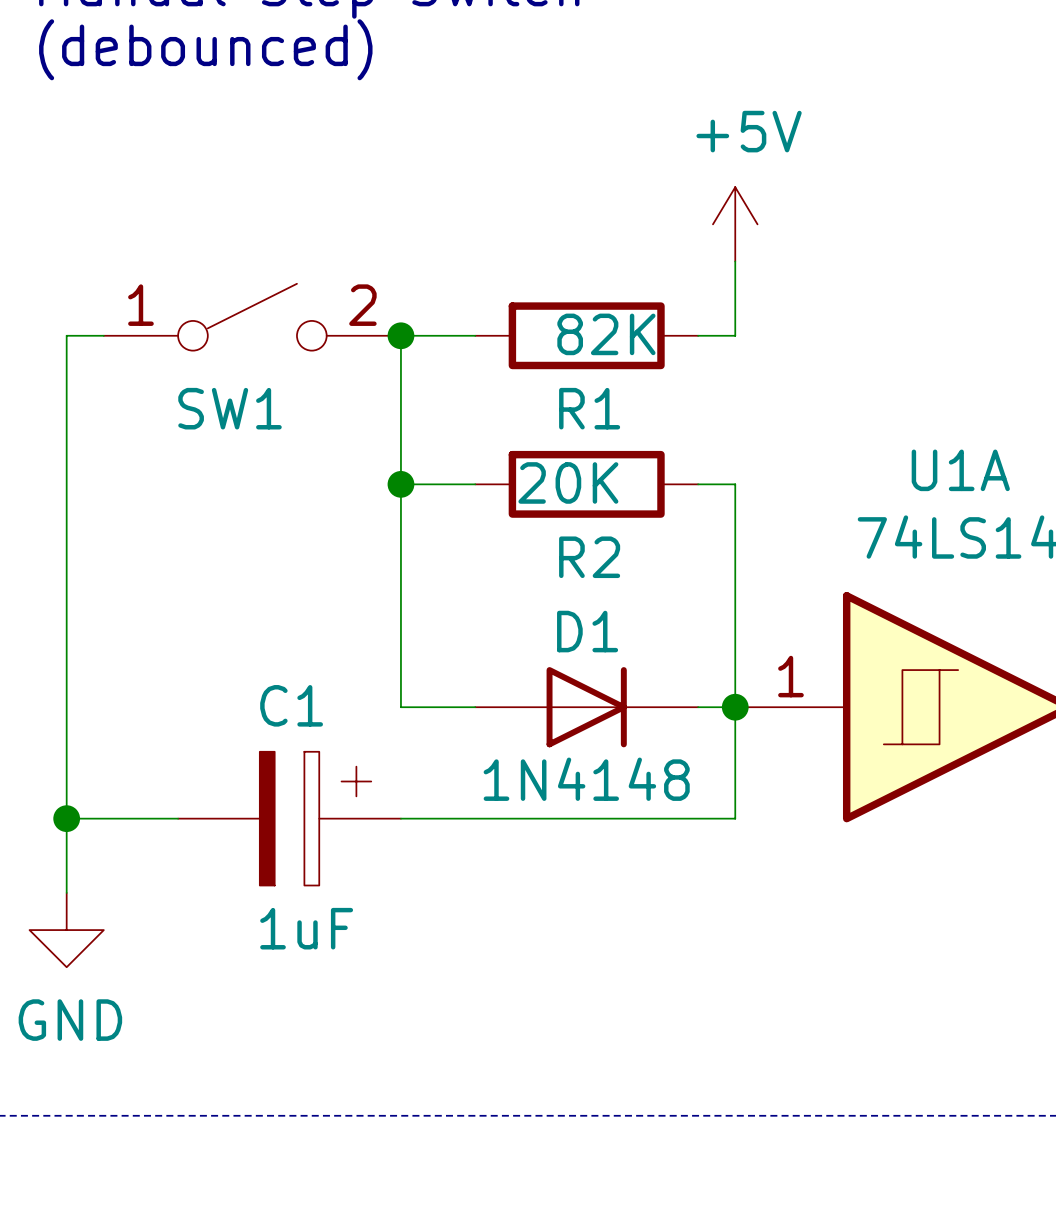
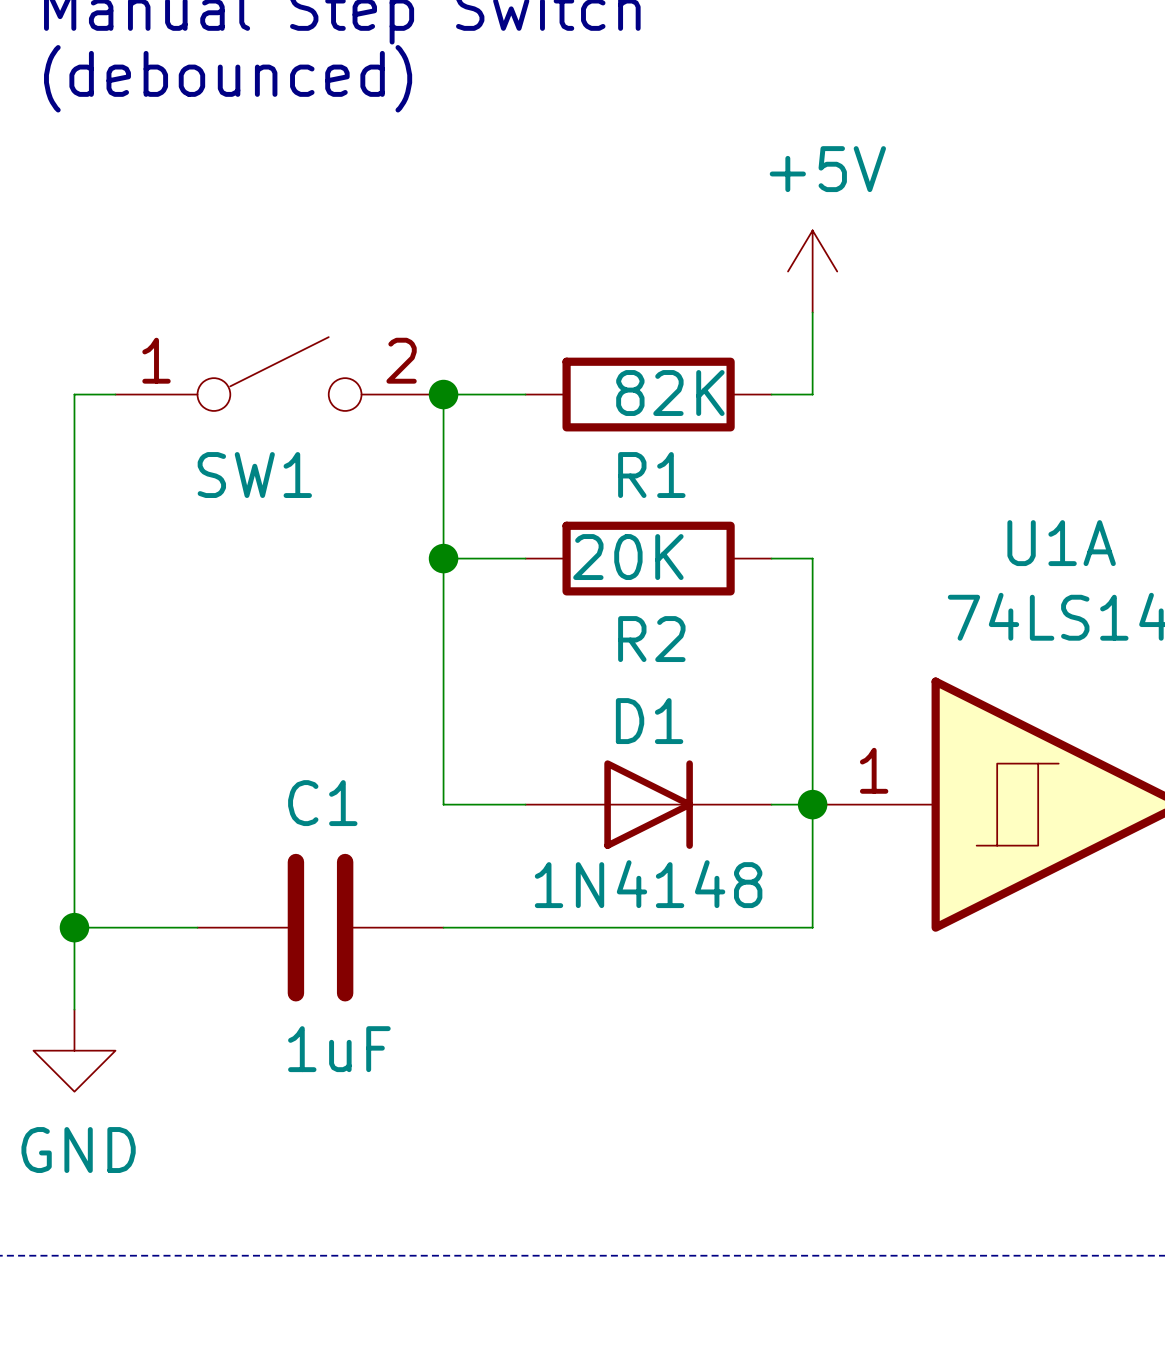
C1 symbol: [178, 751, 401, 886] -> [197, 853, 444, 1002]

